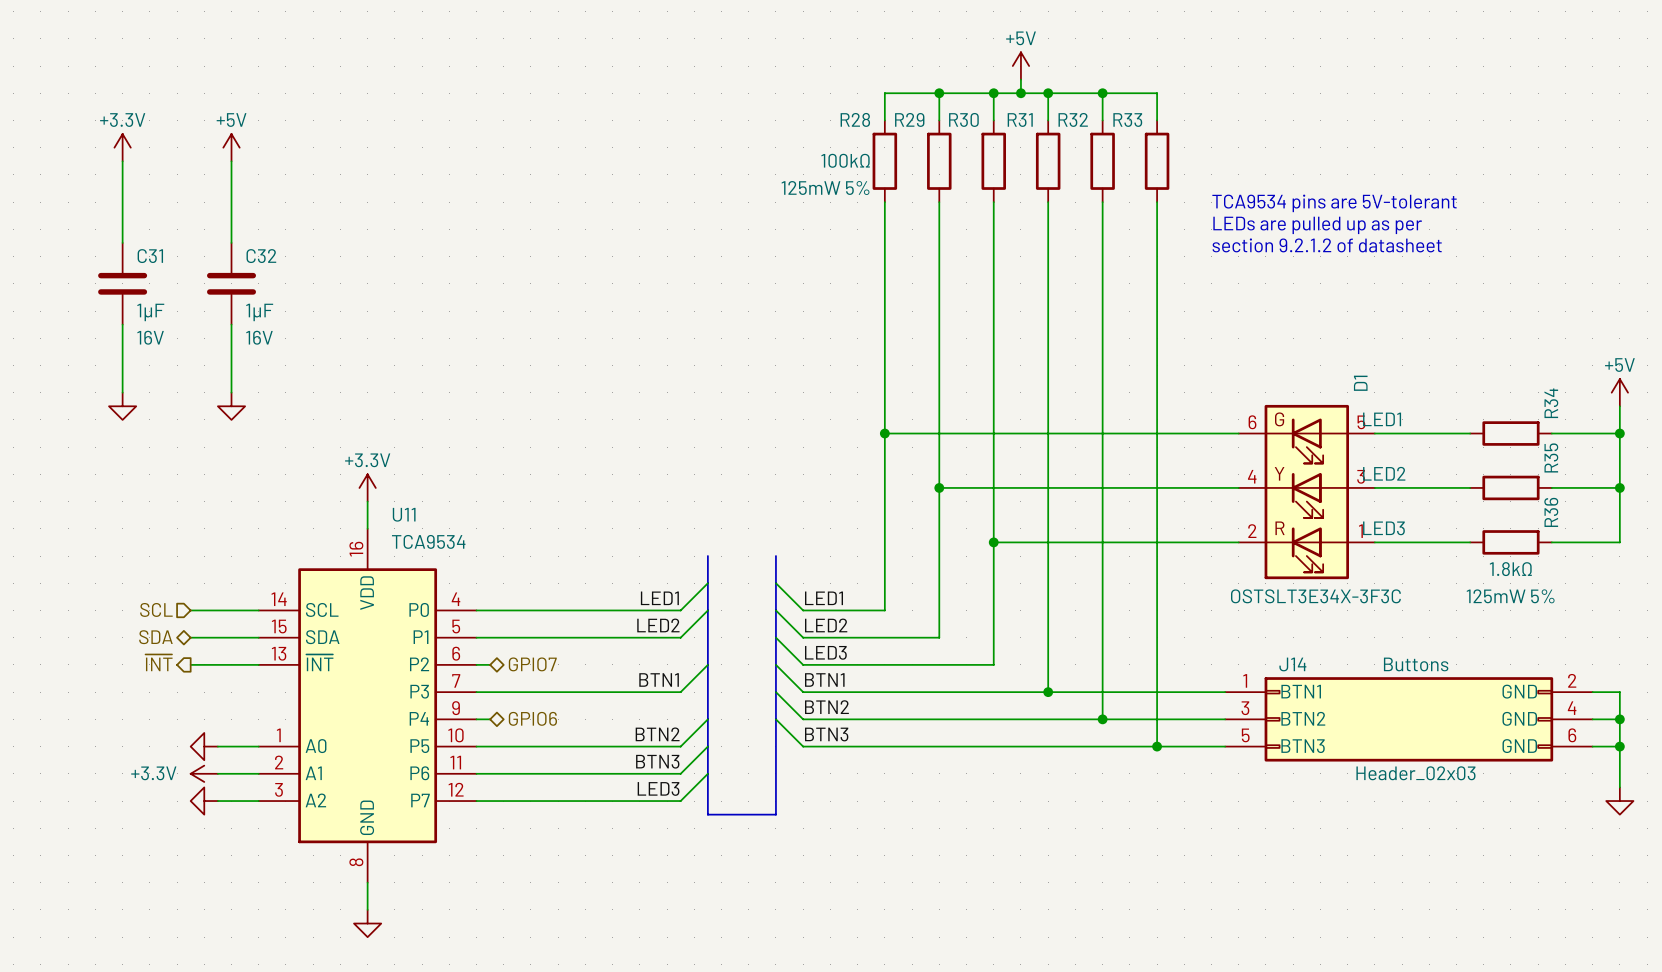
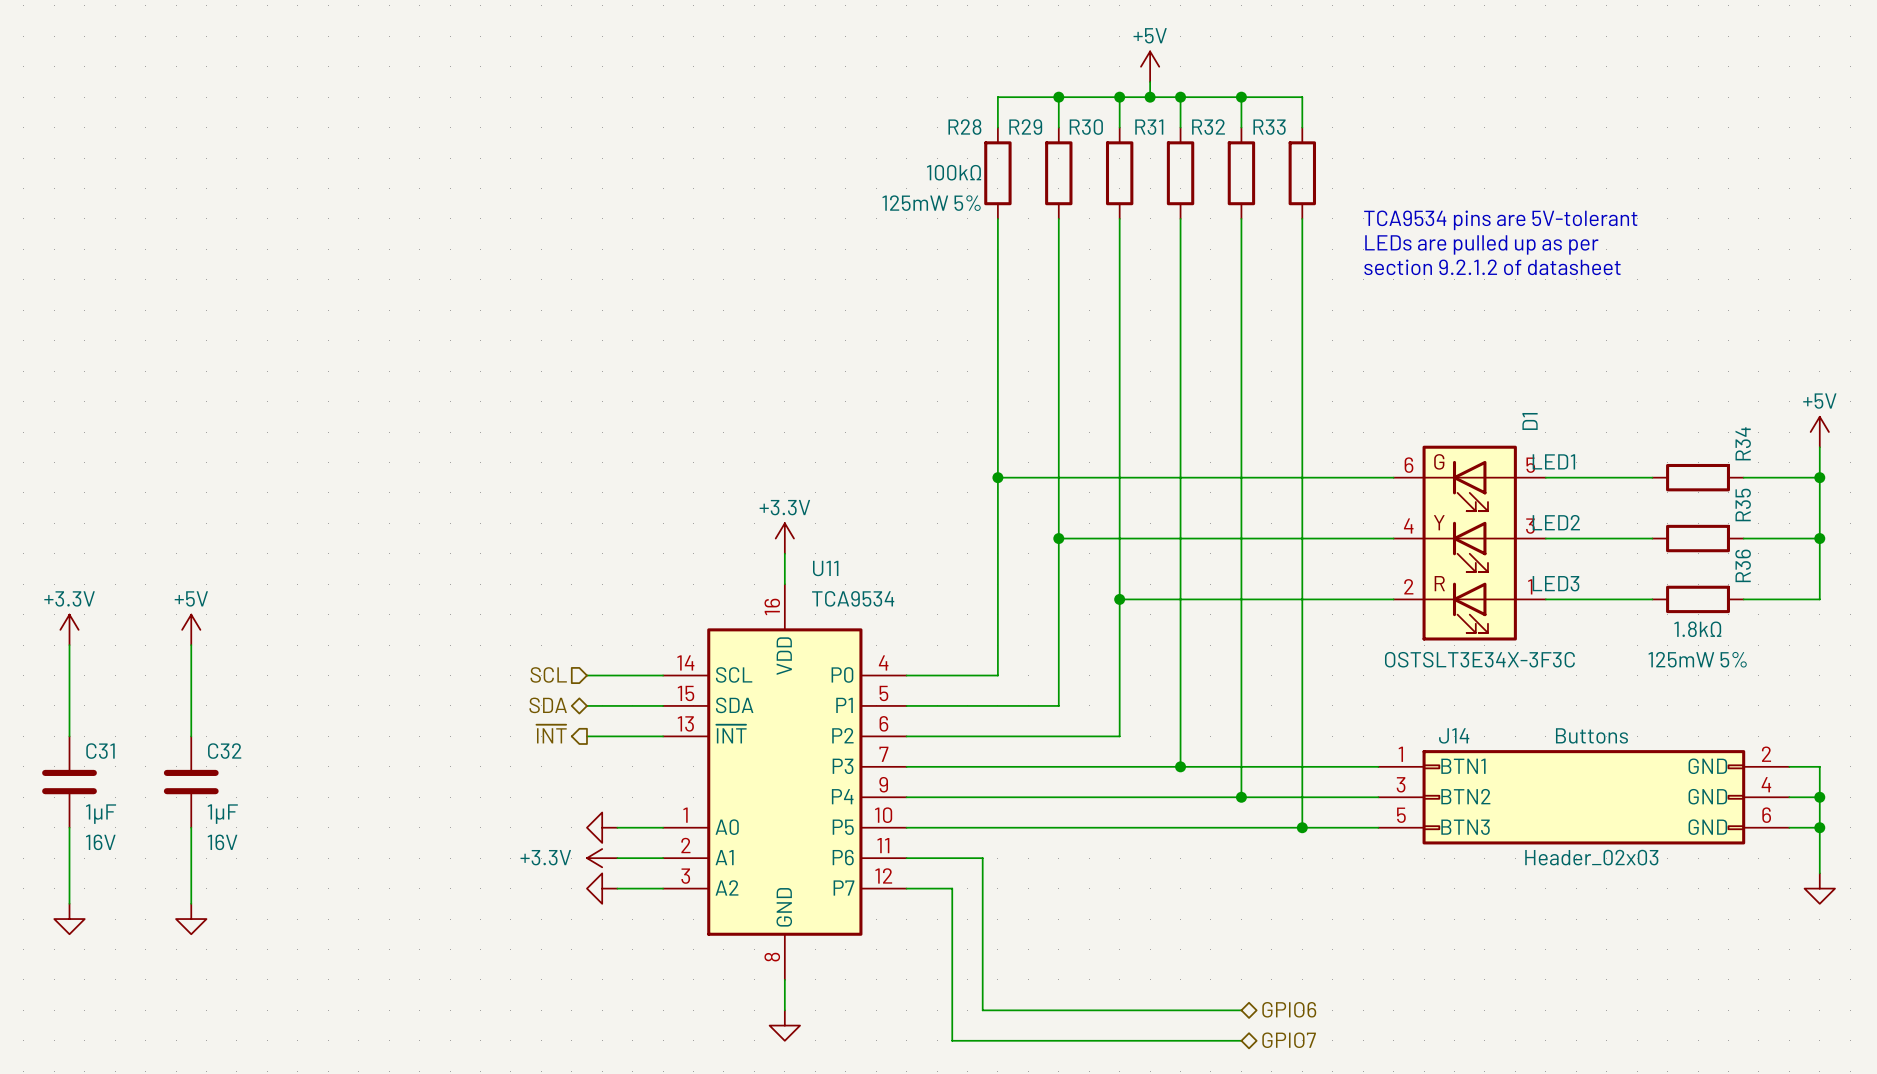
power symbol: +3.3V (122, 147) -> none
power symbol: +5V (231, 147) -> none
wire: (122, 161) (122, 242) -> none
wire: (231, 161) (231, 242) -> none
C31 position: (122, 283) -> (69, 782)
C32 position: (231, 283) -> (191, 782)
wire: (122, 324) (122, 392) -> none
wire: (231, 324) (231, 392) -> none
power symbol: (122, 406) -> none
power symbol: (231, 406) -> none
power symbol: +3.3V (367, 487) -> none
power symbol: none -> +3.3V (784, 538)
wire: (367, 501) (367, 528) -> none
wire: none -> (784, 553) (784, 584)
bus: (707, 556) (707, 814) (775, 814) (775, 556) -> none
power symbol: none -> +3.3V (69, 629)
power symbol: none -> +5V (191, 629)
wire: none -> (69, 645) (69, 736)
wire: none -> (191, 645) (191, 736)
wire: (775, 583) (803, 610) -> none
label: LED1 (659, 598) -> none
label: LED1 (824, 598) -> none
hierarchical label: SCL (156, 609) -> none
hierarchical label: none -> SCL (548, 674)
wire: (190, 610) (258, 610) -> none
wire: (476, 610) (517, 610) -> none
wire: (775, 610) (803, 637) -> none
label: LED2 (658, 625) -> none
label: LED2 (826, 625) -> none
hierarchical label: SDA (155, 637) -> none
wire: (190, 637) (258, 637) -> none
wire: (476, 637) (517, 637) -> none
hierarchical label: none -> SDA (548, 705)
wire: (775, 637) (803, 664) -> none
label: LED3 (825, 652) -> none
hierarchical label: ~{INT} (159, 662) -> none
wire: (190, 664) (258, 664) -> none
wire: (476, 664) (490, 664) -> none
hierarchical label shape: bidirectional (532, 664) -> output (551, 734)
hierarchical label: GPIO7 (532, 664) -> ~{INT} (551, 734)
wire: (707, 664) (680, 692) (476, 692) -> none
wire: (775, 664) (803, 692) -> none
label: BTN1 (659, 679) -> none
label: BTN1 (824, 679) -> none
wire: (775, 692) (803, 719) -> none
U11 position: (367, 705) -> (784, 782)
label: BTN2 (826, 707) -> none
hierarchical label: GPIO6 (532, 718) -> none
wire: (476, 719) (490, 719) -> none
wire: (775, 719) (803, 746) -> none
label: BTN2 (657, 734) -> none
label: BTN3 (826, 734) -> none
wire: none -> (69, 827) (69, 903)
wire: none -> (191, 827) (191, 903)
power symbol: (204, 746) -> none
wire: (217, 746) (258, 746) -> none
wire: (476, 746) (544, 746) -> (586, 736) (663, 736)
power symbol: none -> (602, 827)
label: BTN3 (657, 761) -> none
power symbol: +3.3V (204, 773) -> none
wire: (217, 773) (258, 773) -> none
wire: (476, 773) (544, 773) -> none
power symbol: none -> +3.3V (602, 858)
wire: none -> (906, 858) (982, 858) (982, 1010) (1241, 1010)
label: LED3 (658, 788) -> none
power symbol: (204, 801) -> none
wire: (217, 801) (258, 801) -> none
wire: (476, 801) (544, 801) -> none
power symbol: none -> (602, 888)
wire: none -> (906, 888) (952, 888) (952, 1040) (1241, 1040)
power symbol: none -> (69, 919)
power symbol: none -> (191, 919)
wire: (367, 882) (367, 909) -> none
wire: none -> (784, 979) (784, 1010)
hierarchical label: none -> GPIO6 (1289, 1009)
power symbol: (367, 923) -> none
power symbol: none -> (784, 1025)
hierarchical label: none -> GPIO7 (1289, 1040)

